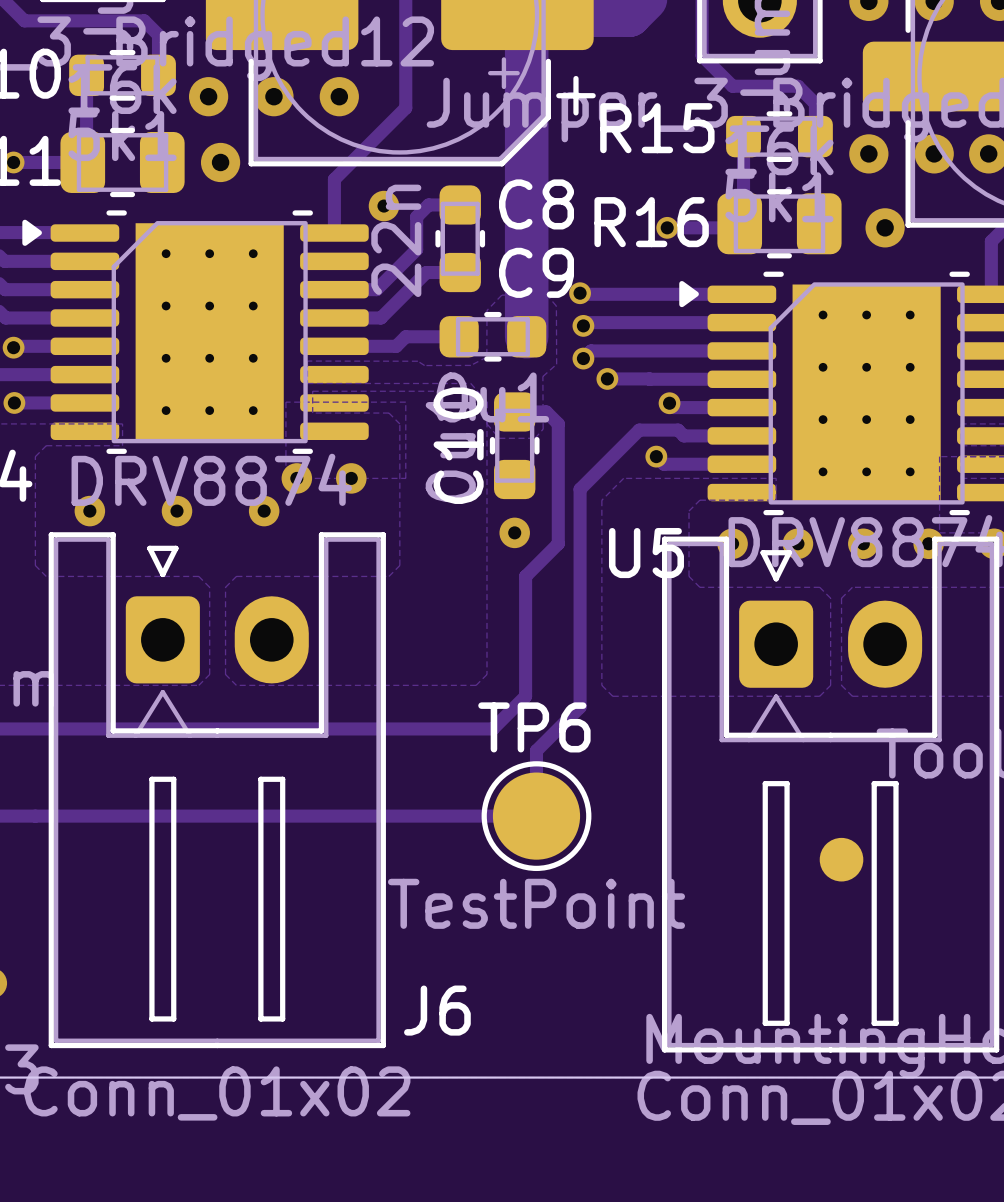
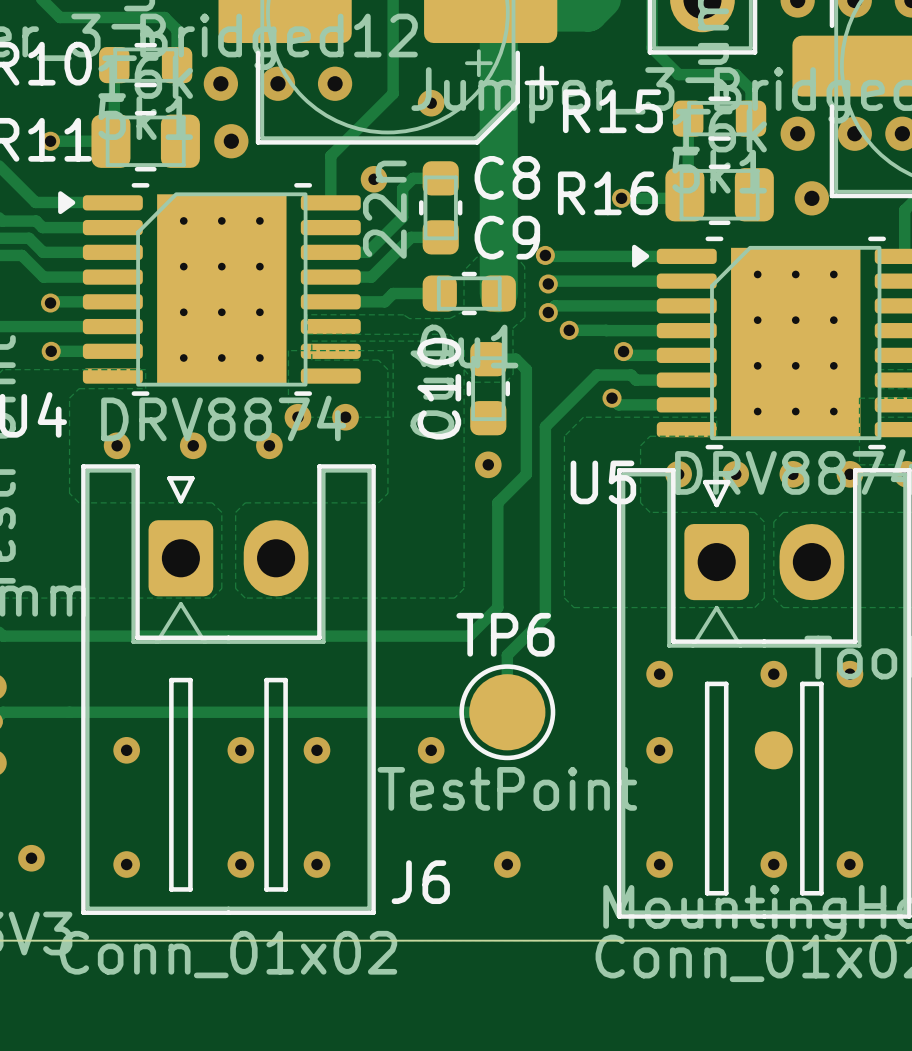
via: none -> (431, 103)
via: none -> (659, 674)
via: none -> (773, 674)
via: none -> (849, 674)
via: none -> (126, 750)
via: none -> (240, 750)
via: none -> (316, 750)
via: none -> (431, 750)
via: none -> (659, 750)
via: none -> (126, 864)
via: none -> (240, 864)
via: none -> (316, 864)
via: none -> (507, 864)
via: none -> (659, 864)
via: none -> (773, 864)
via: none -> (849, 864)

